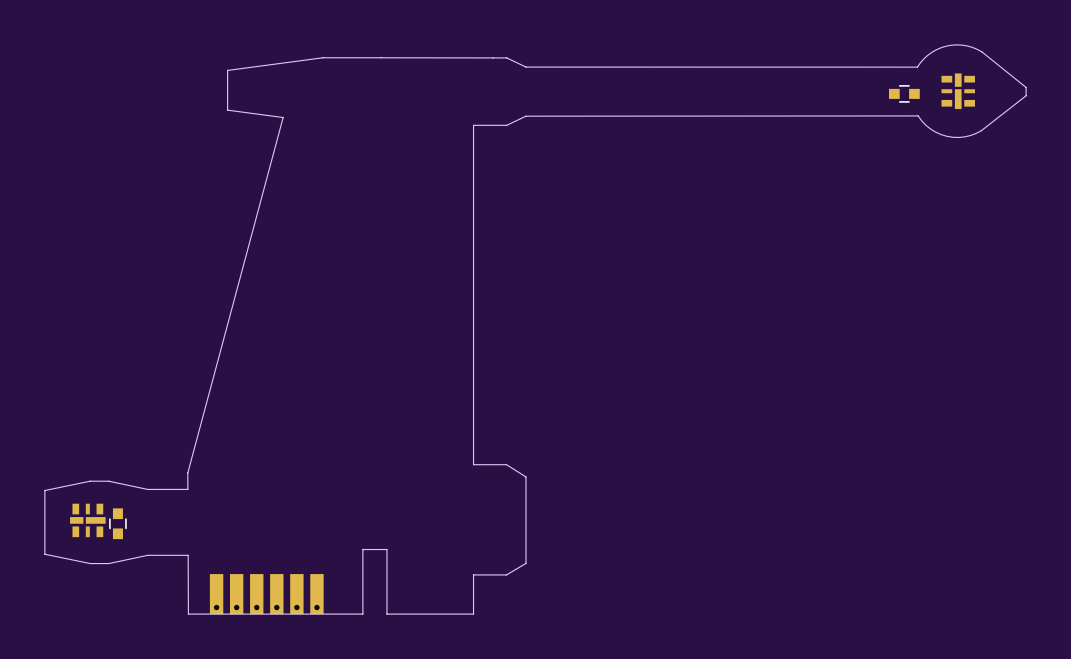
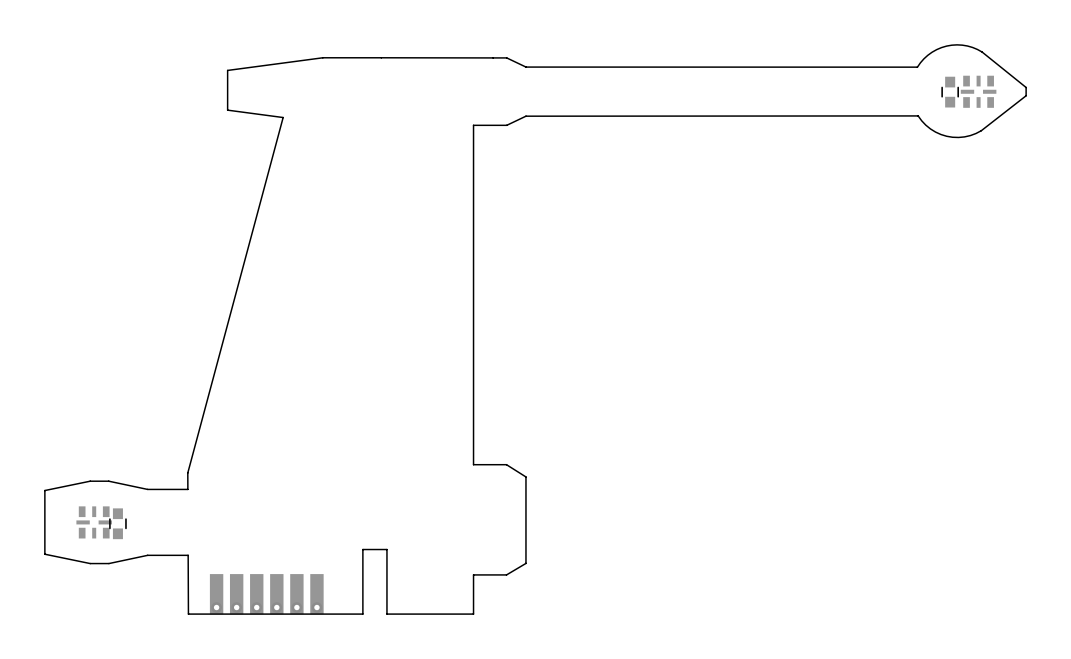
part footprint: [941, 73, 975, 110] -> [941, 76, 959, 108]
part: none -> (978, 91)
part: (904, 93) -> none
part footprint: [70, 503, 106, 538] -> [76, 506, 112, 539]

